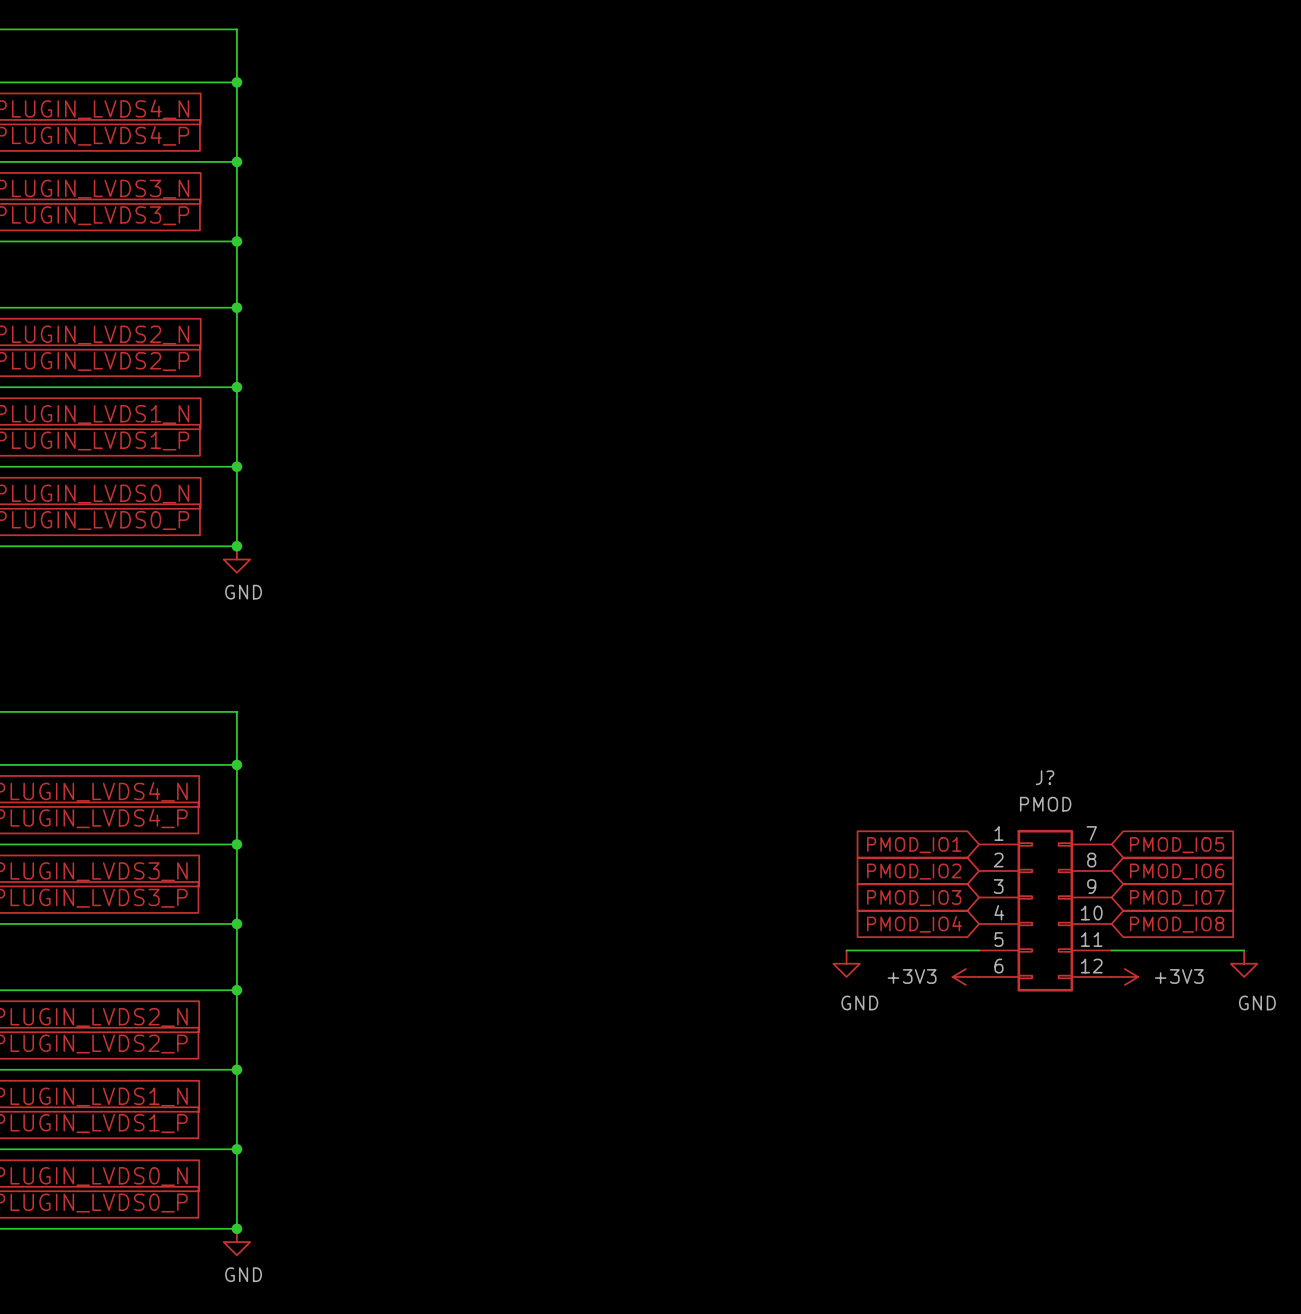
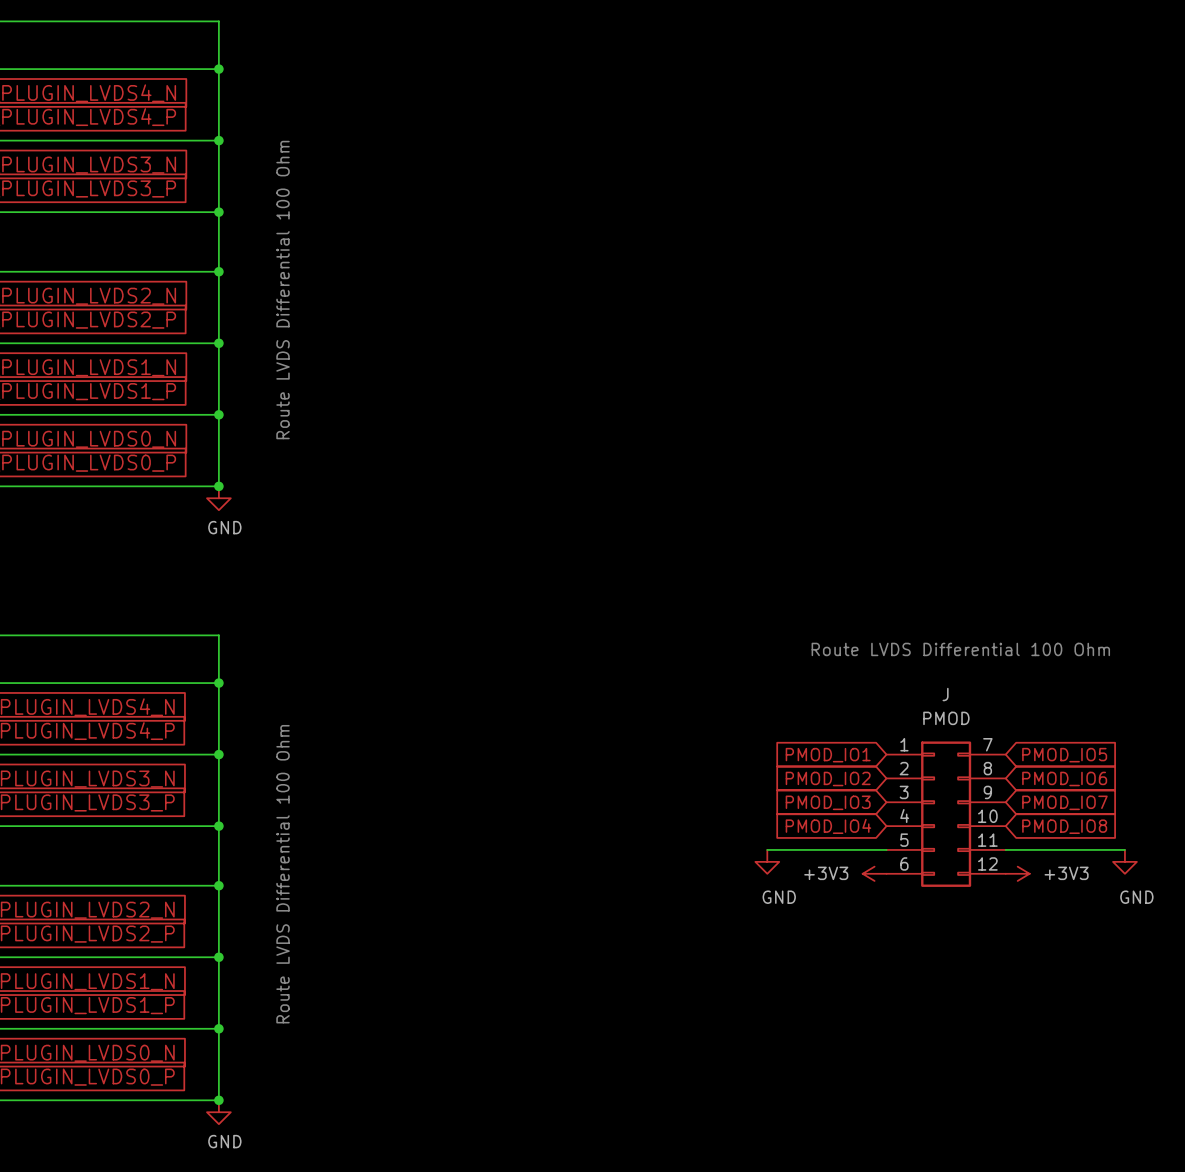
text: none -> Route LVDS Differential 100 Ohm (283, 290)
text: none -> Route LVDS Differential 100 Ohm (960, 649)
J? name: J? (1045, 777) -> J (945, 694)
text: none -> Route LVDS Differential 100 Ohm (283, 874)

